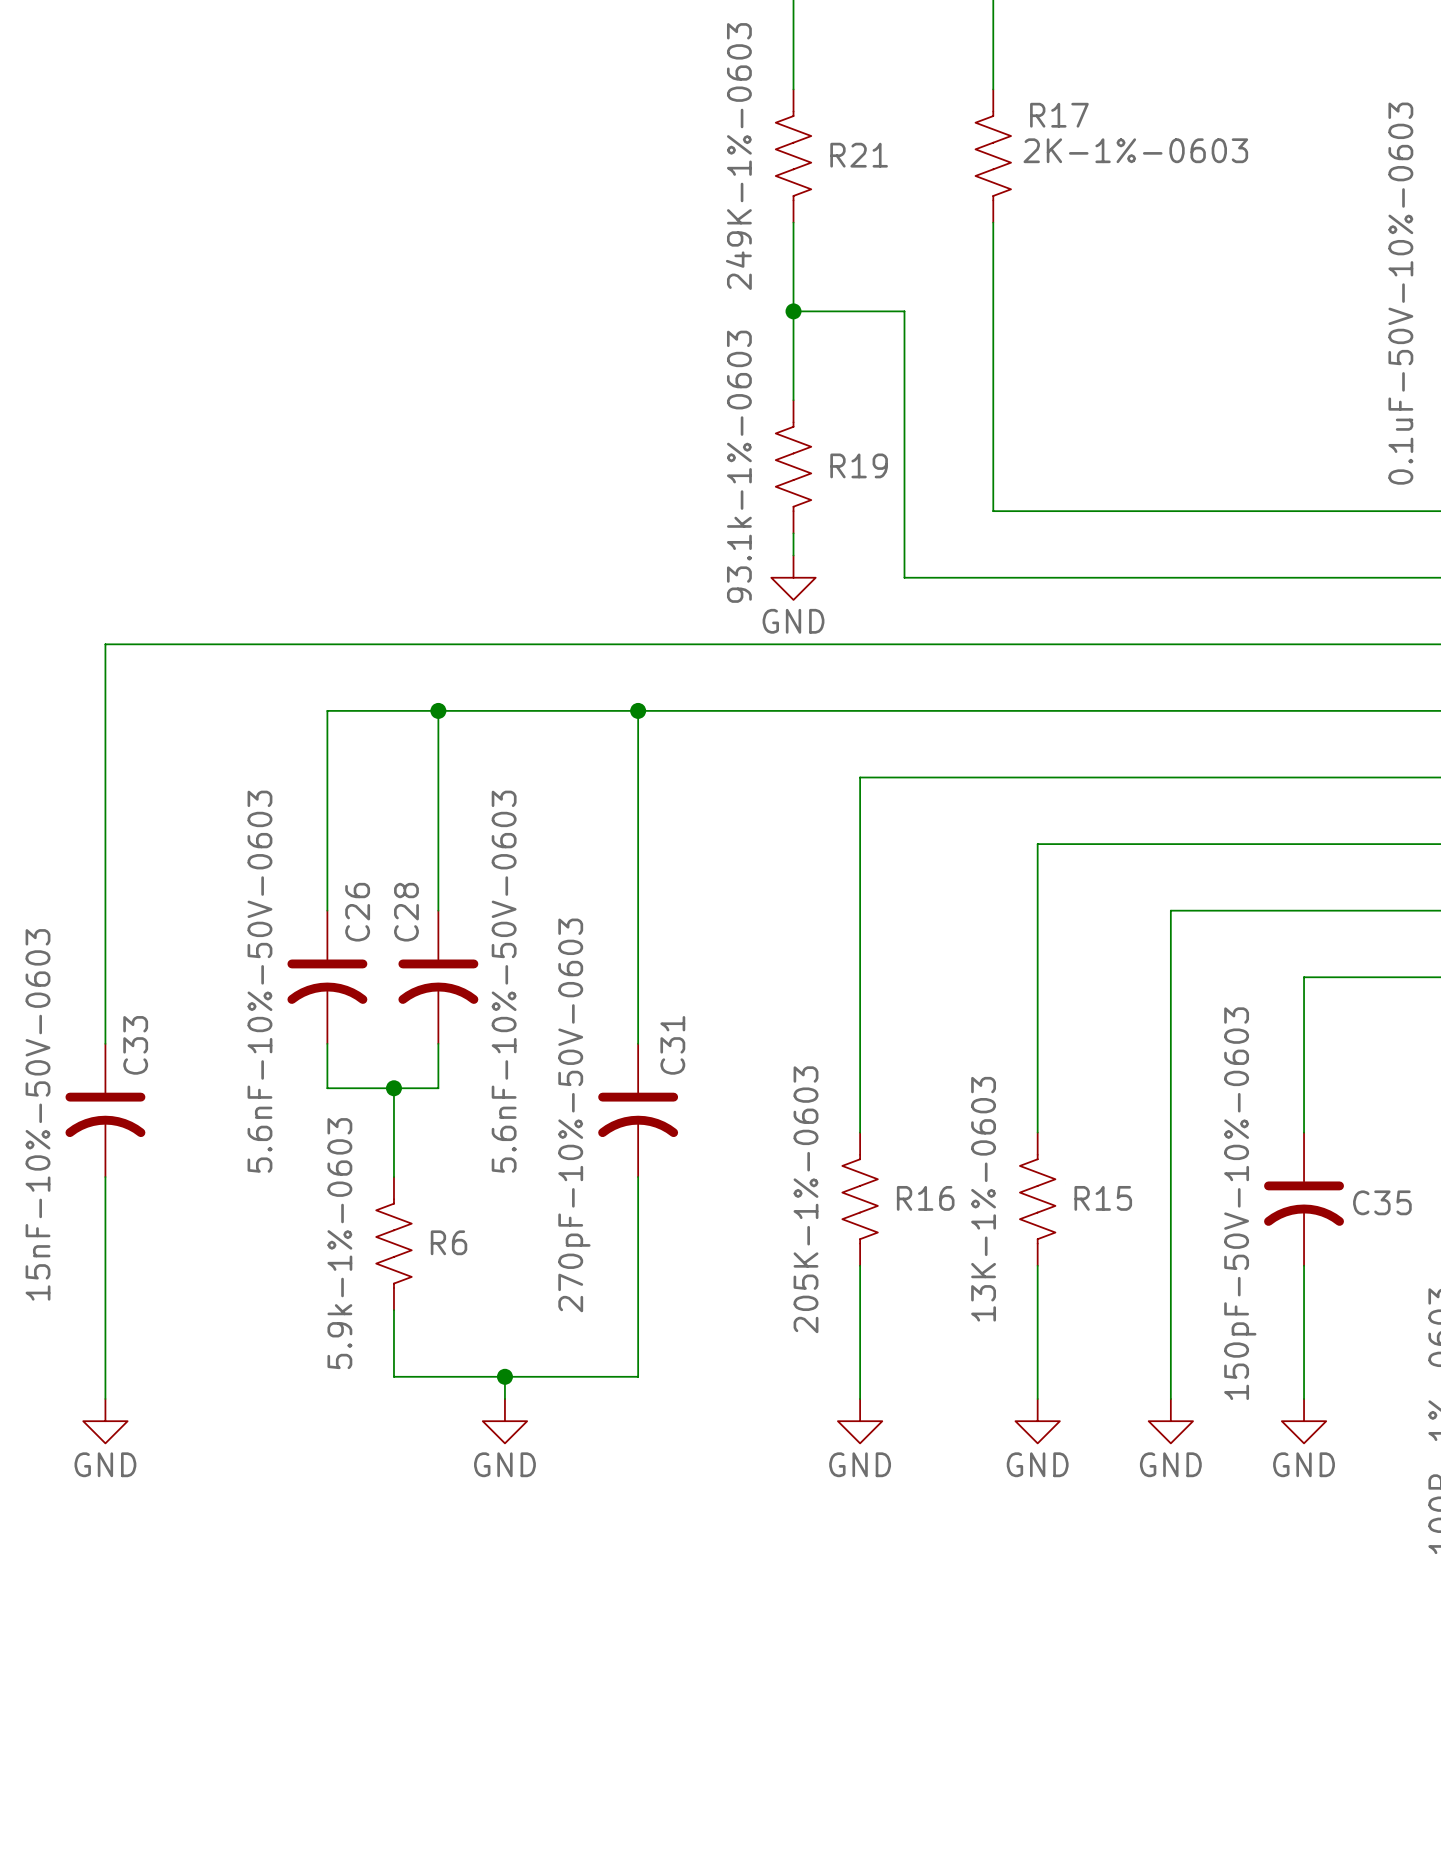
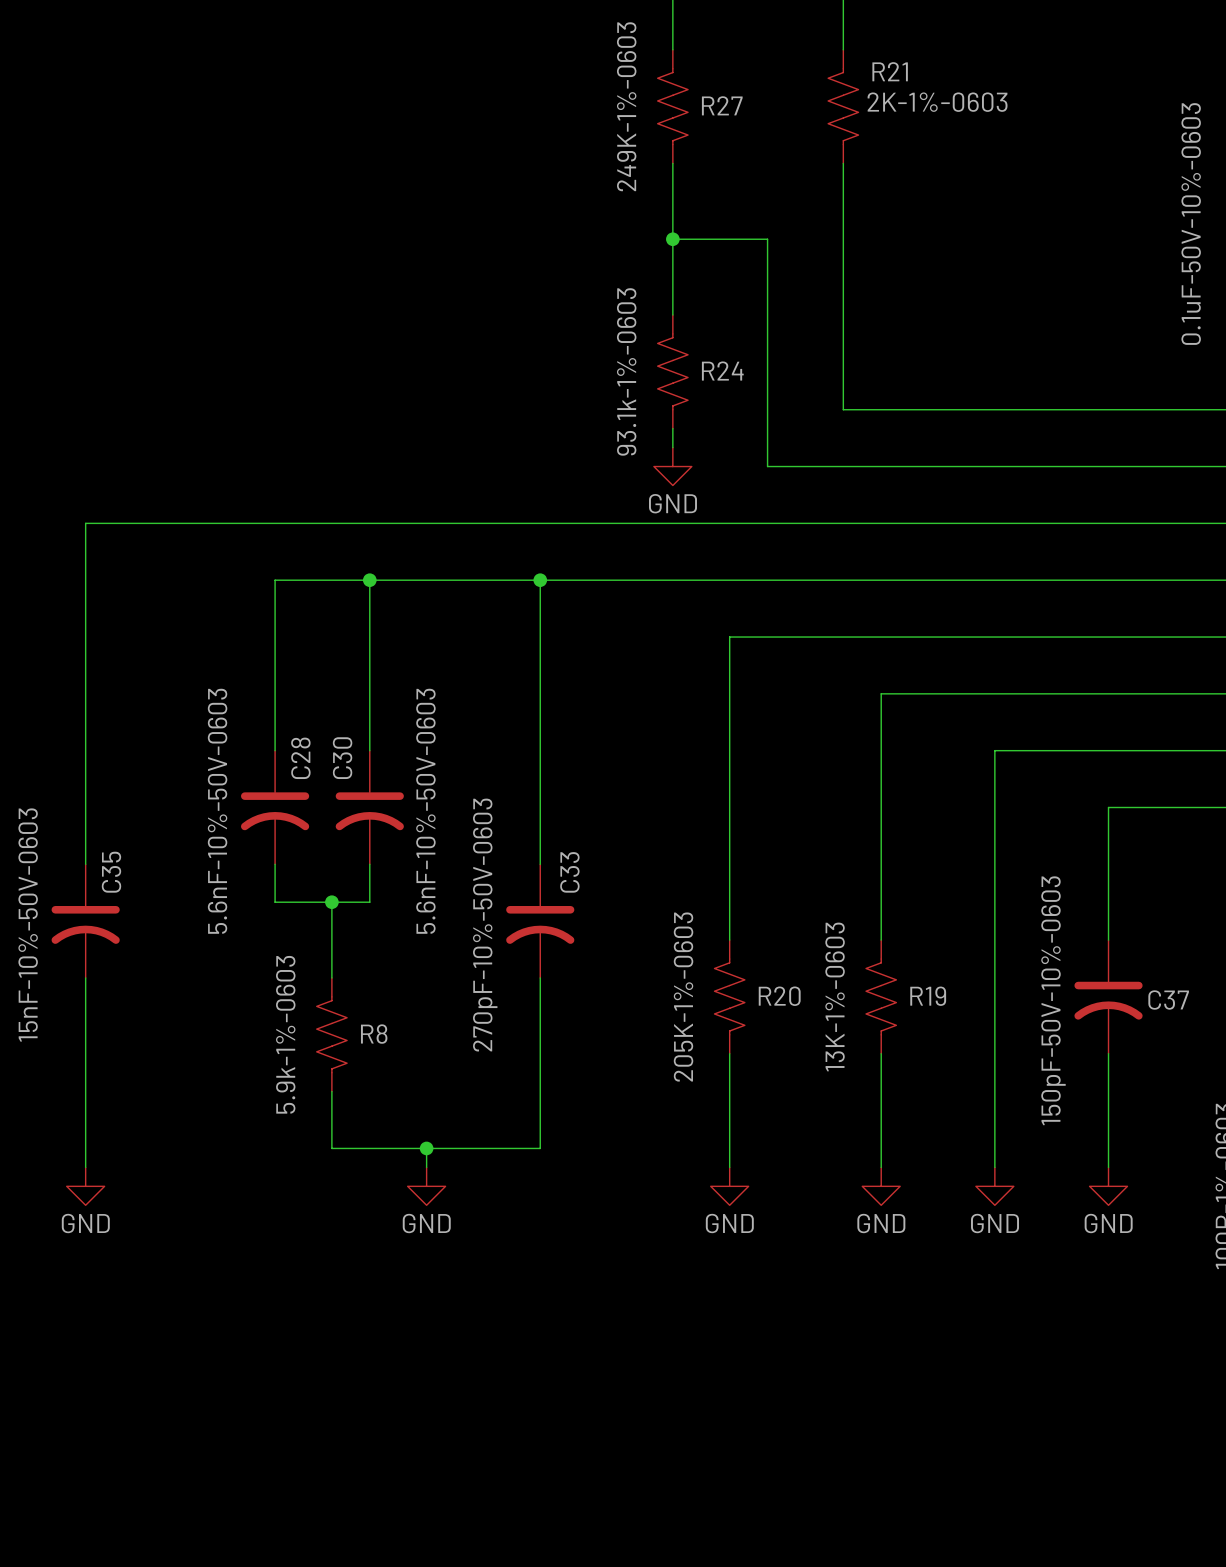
R17 name: R17 (1059, 115) -> R21 (890, 71)
R21 name: R21 (859, 155) -> R27 (722, 105)
R19 name: R19 (859, 465) -> R24 (722, 371)
C26 name: C26 (357, 912) -> C28 (300, 758)
C28 name: C28 (406, 912) -> C30 (342, 758)
C33 name: C33 (135, 1045) -> C35 (111, 872)
C31 name: C31 (672, 1045) -> C33 (569, 872)
R16 name: R16 (925, 1198) -> R20 (779, 996)
R15 name: R15 (1103, 1198) -> R19 (928, 996)
C35 name: C35 (1382, 1202) -> C37 (1168, 1000)
R6 name: R6 (449, 1242) -> R8 (374, 1034)

